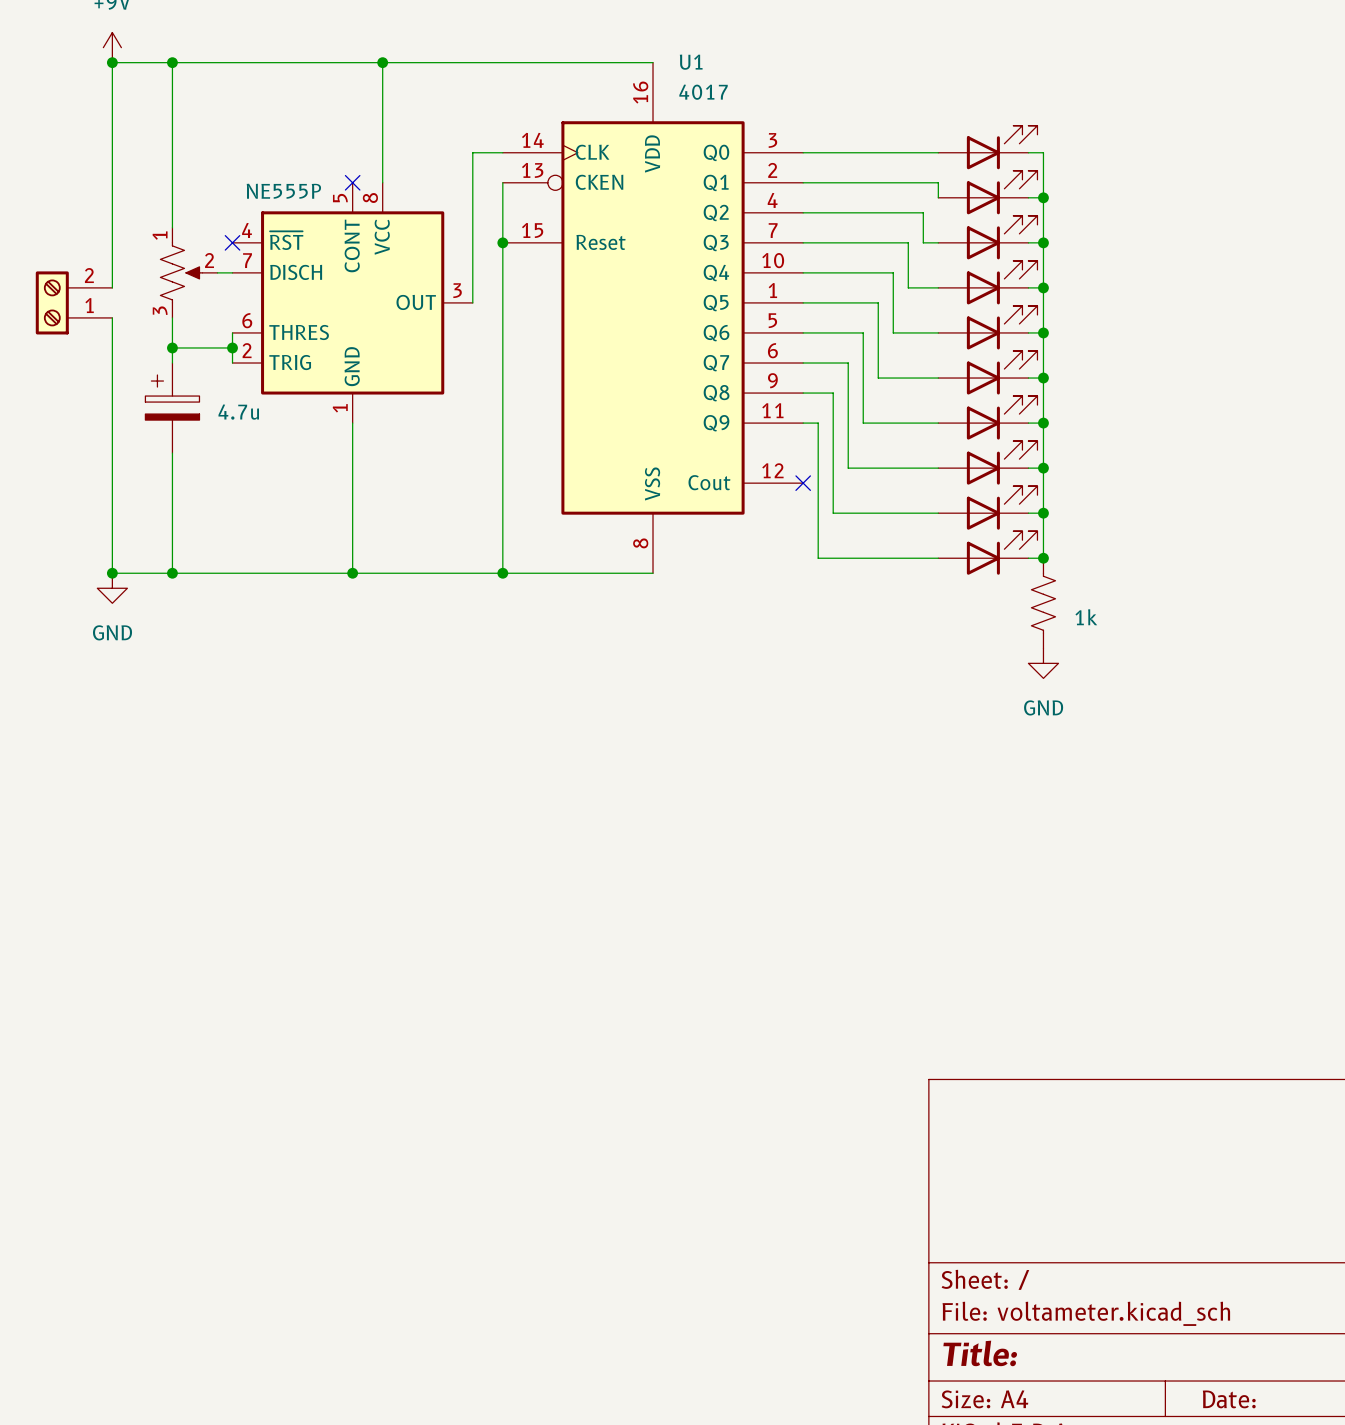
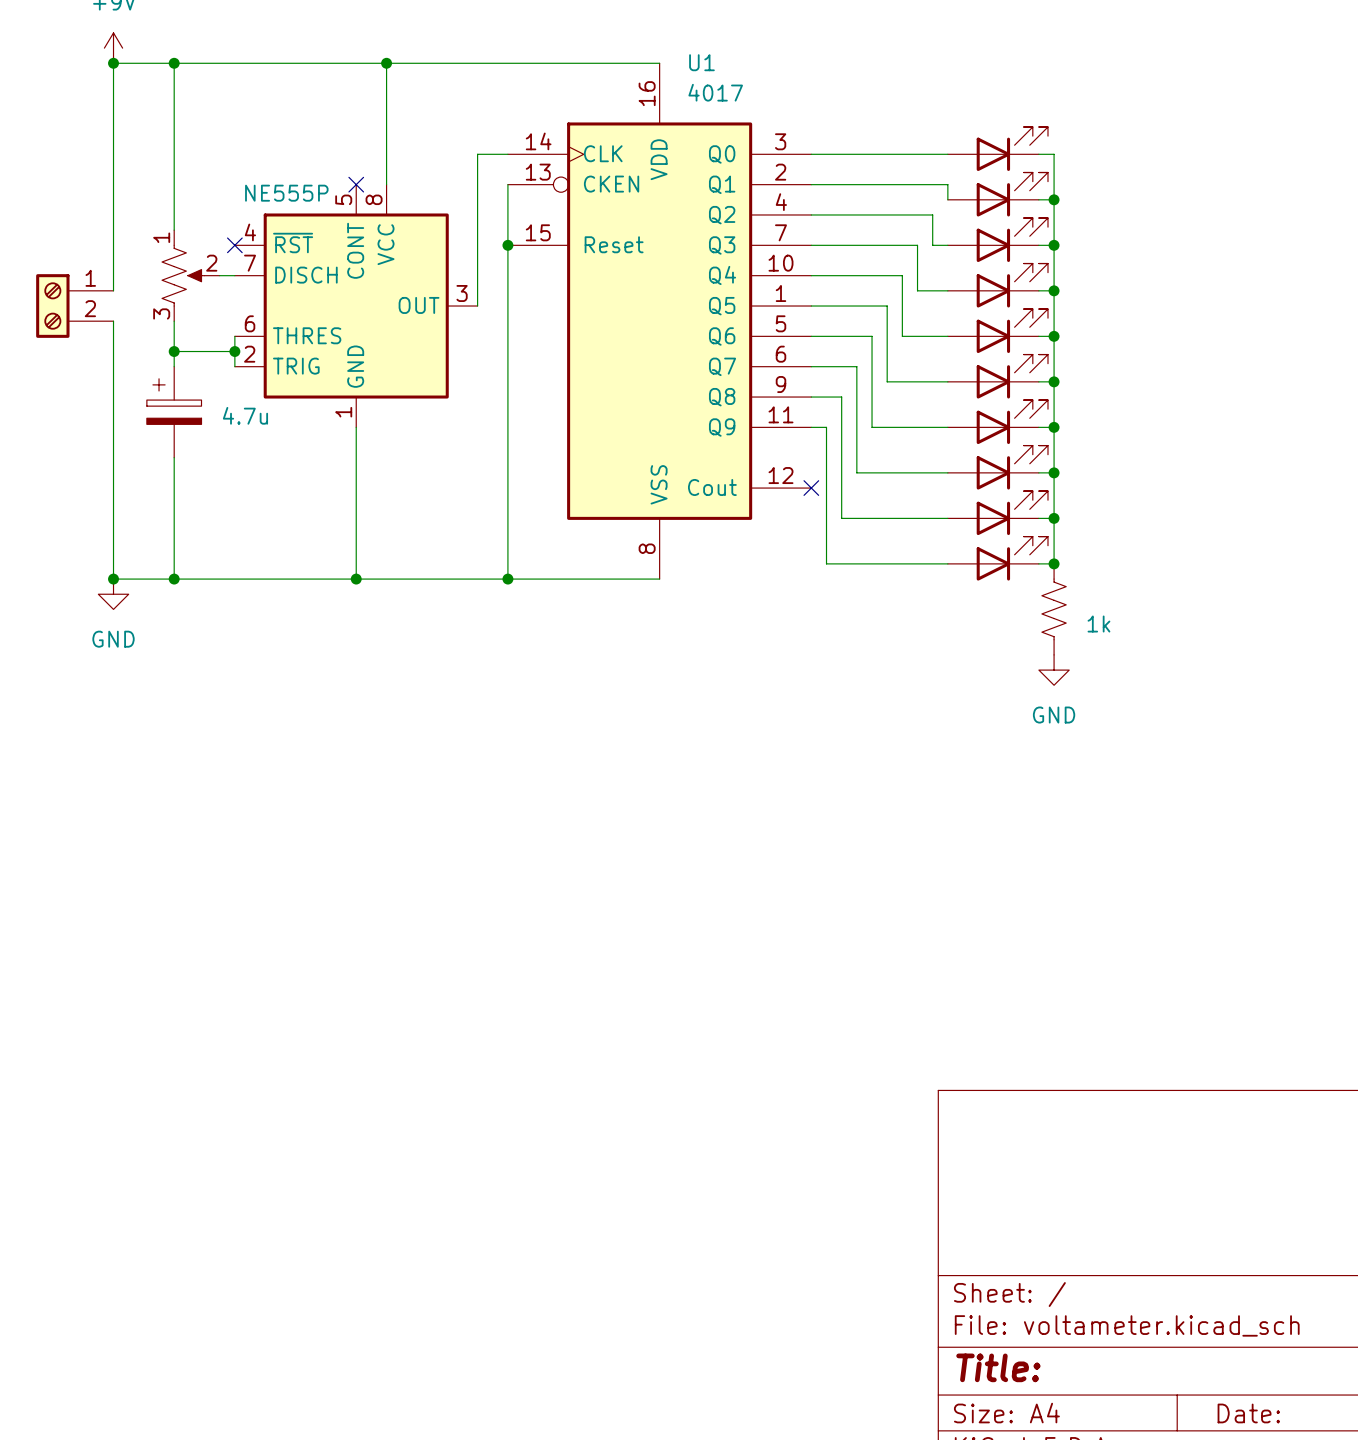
part flip: as is (52, 302) -> up-down (52, 306)

